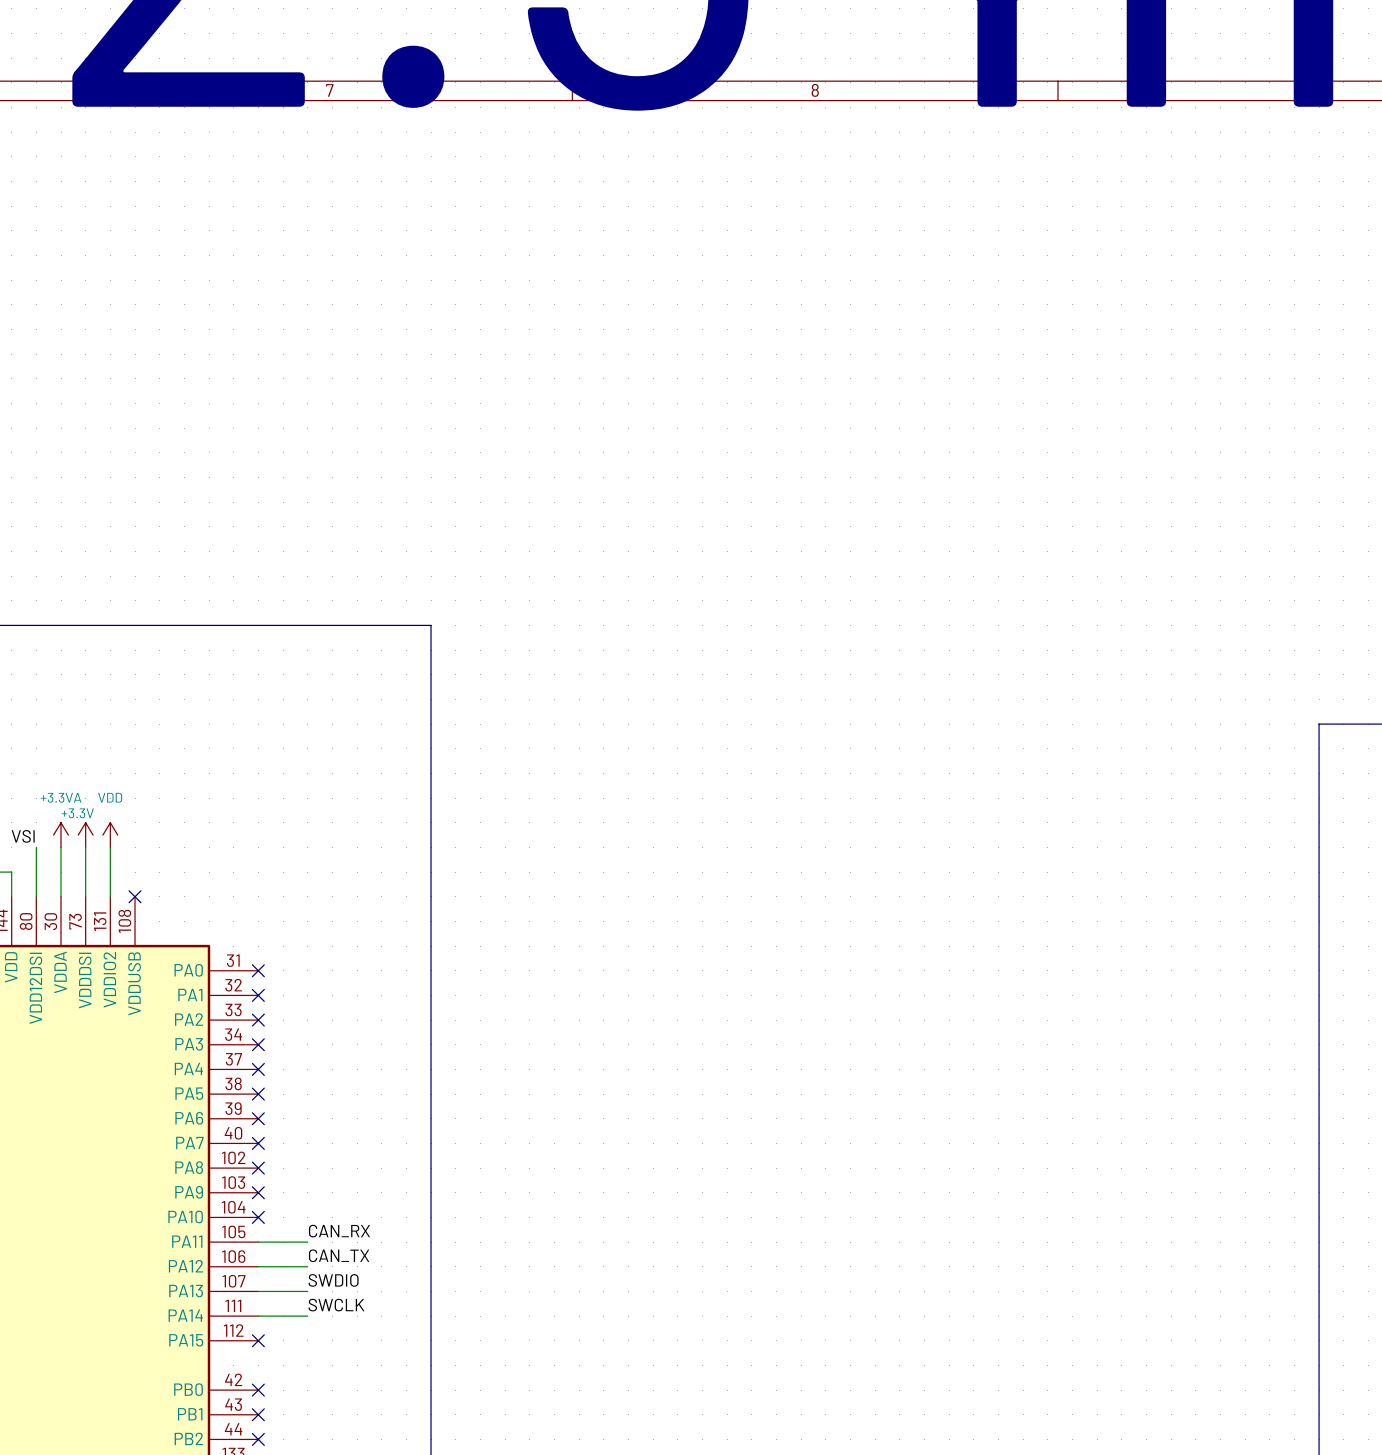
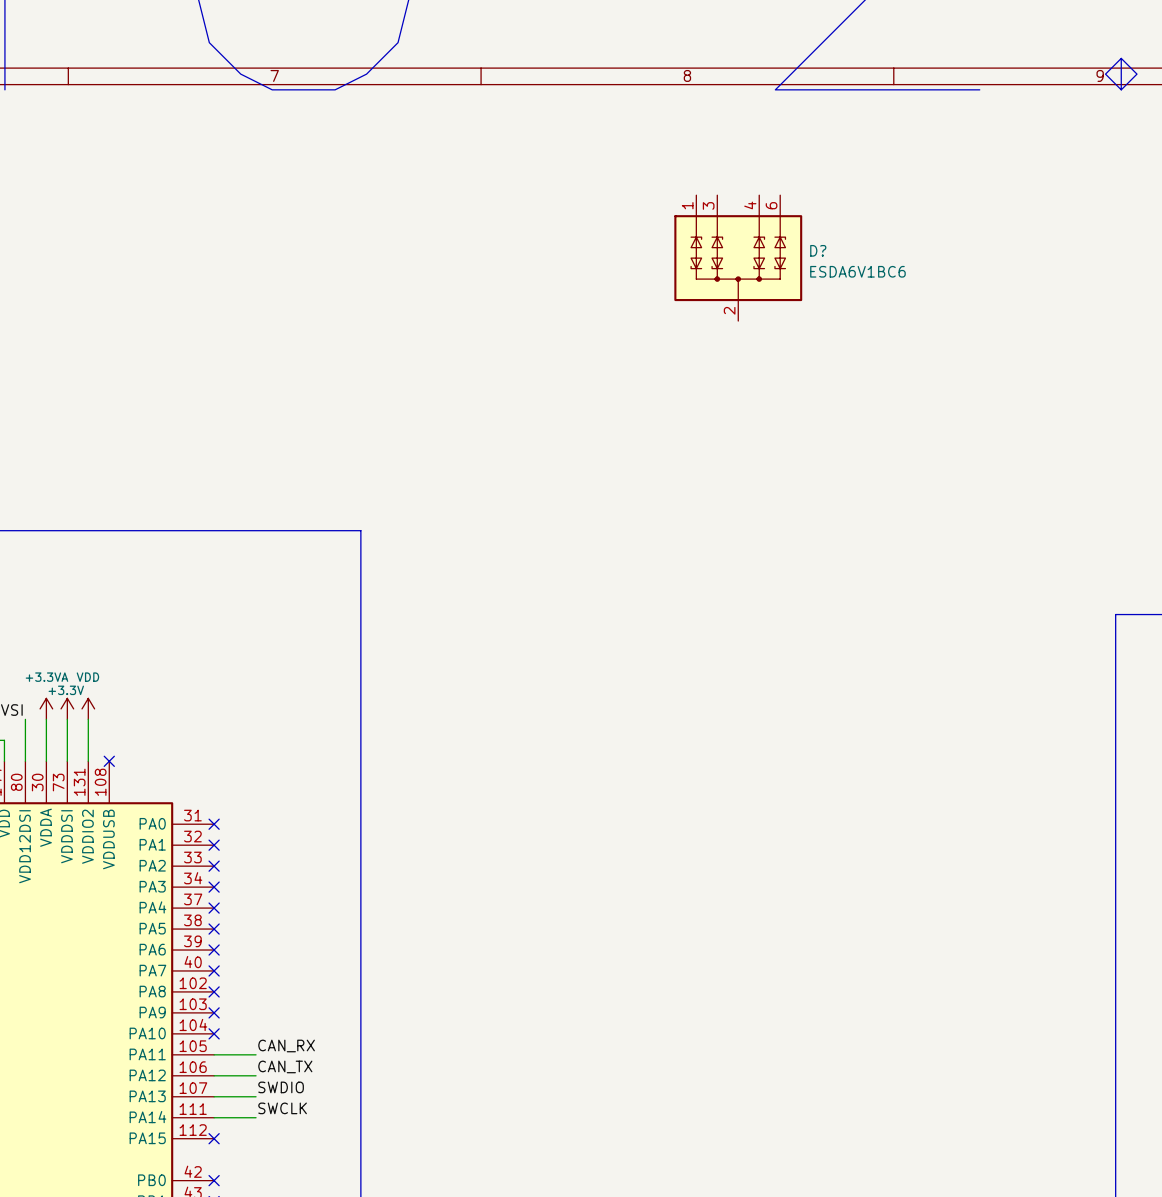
D?: none -> ESDA6V1BC6 (738, 258)

